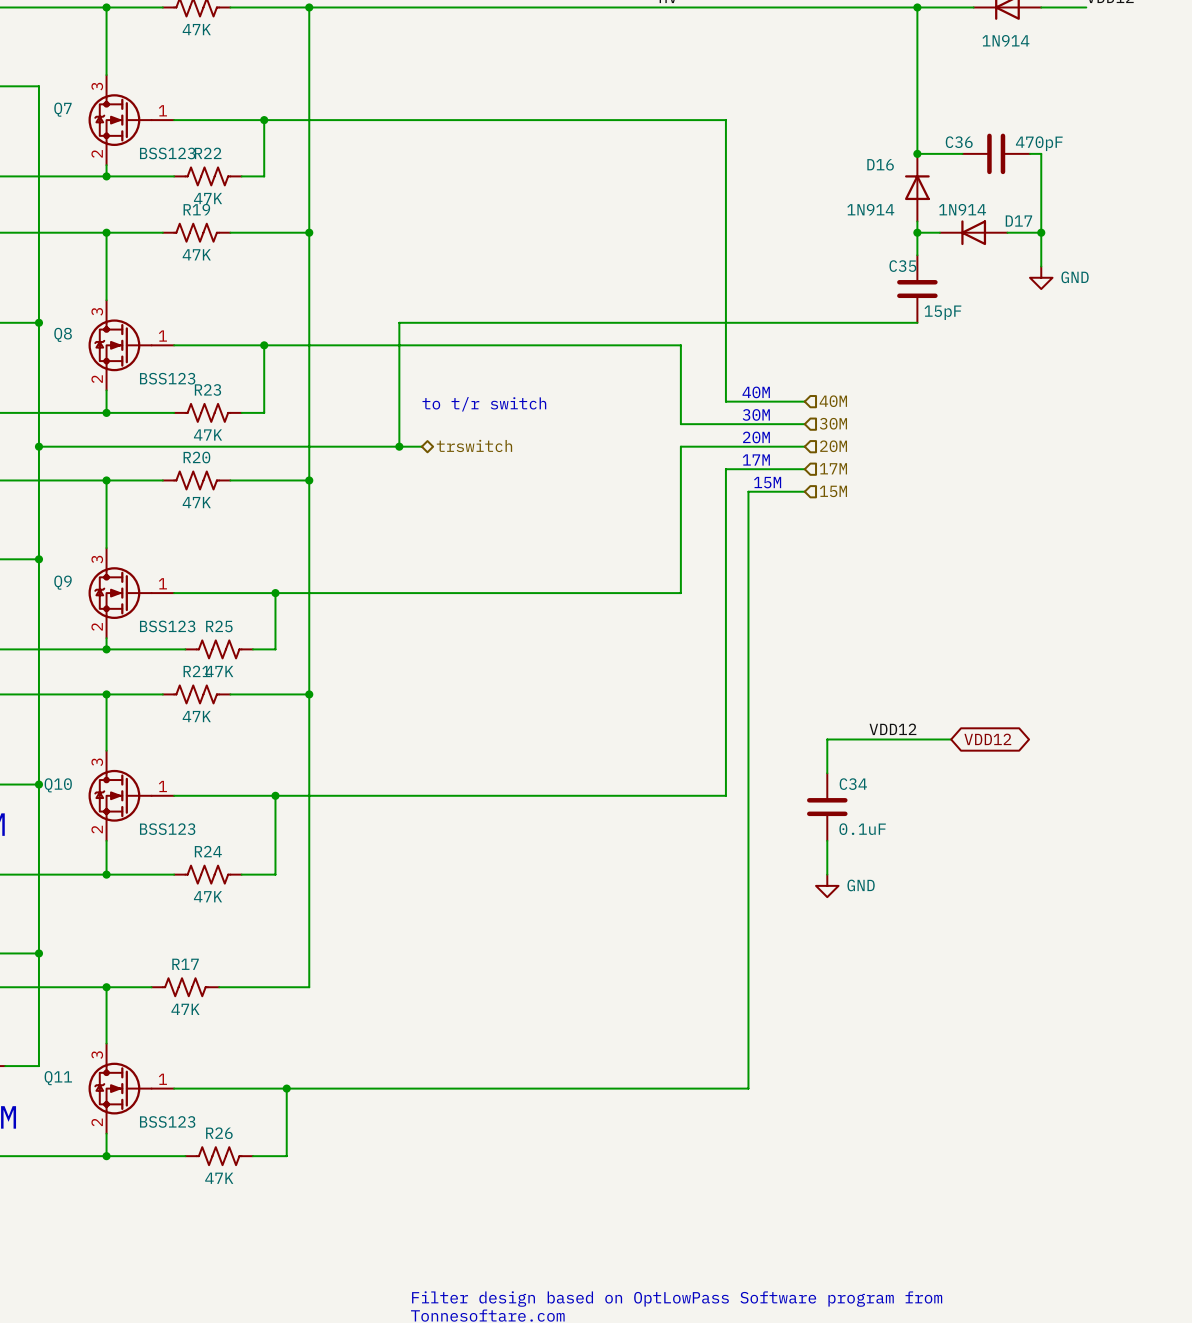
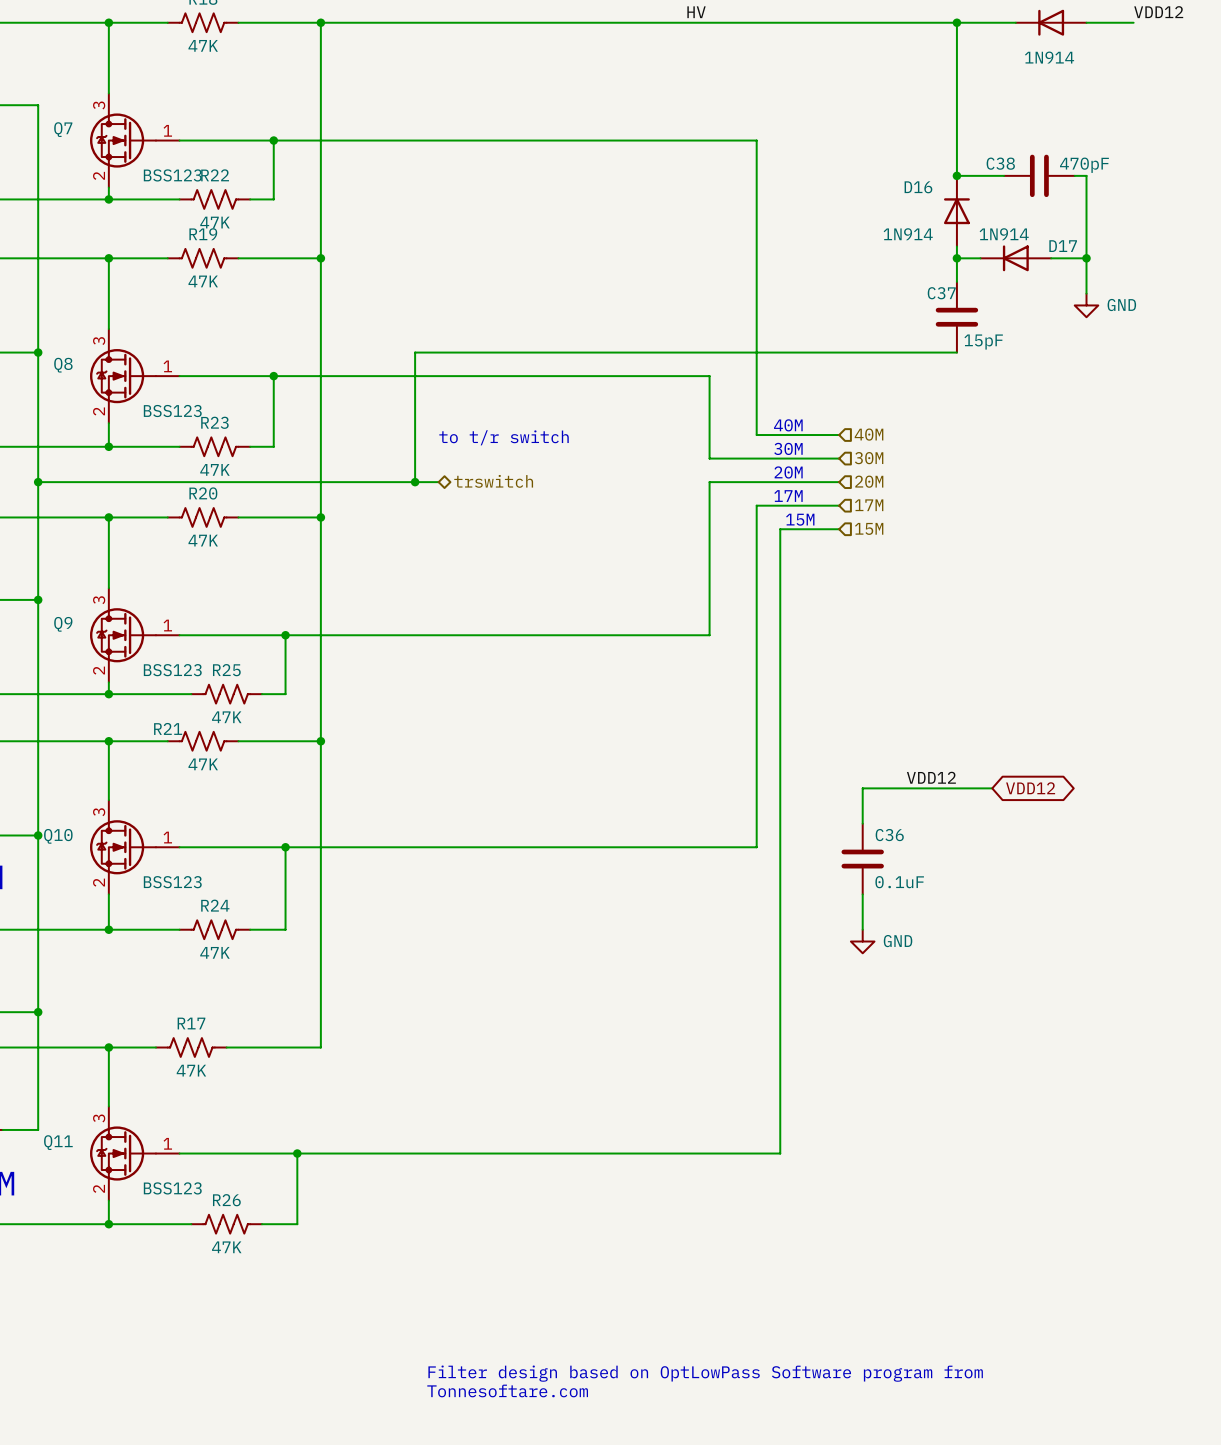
C36 name: C36 (959, 142) -> C38 (1000, 163)
C35 name: C35 (902, 266) -> C37 (941, 293)
R21 name position: R21 (196, 671) -> R21 (168, 728)
C34 name: C34 (853, 784) -> C36 (889, 835)

